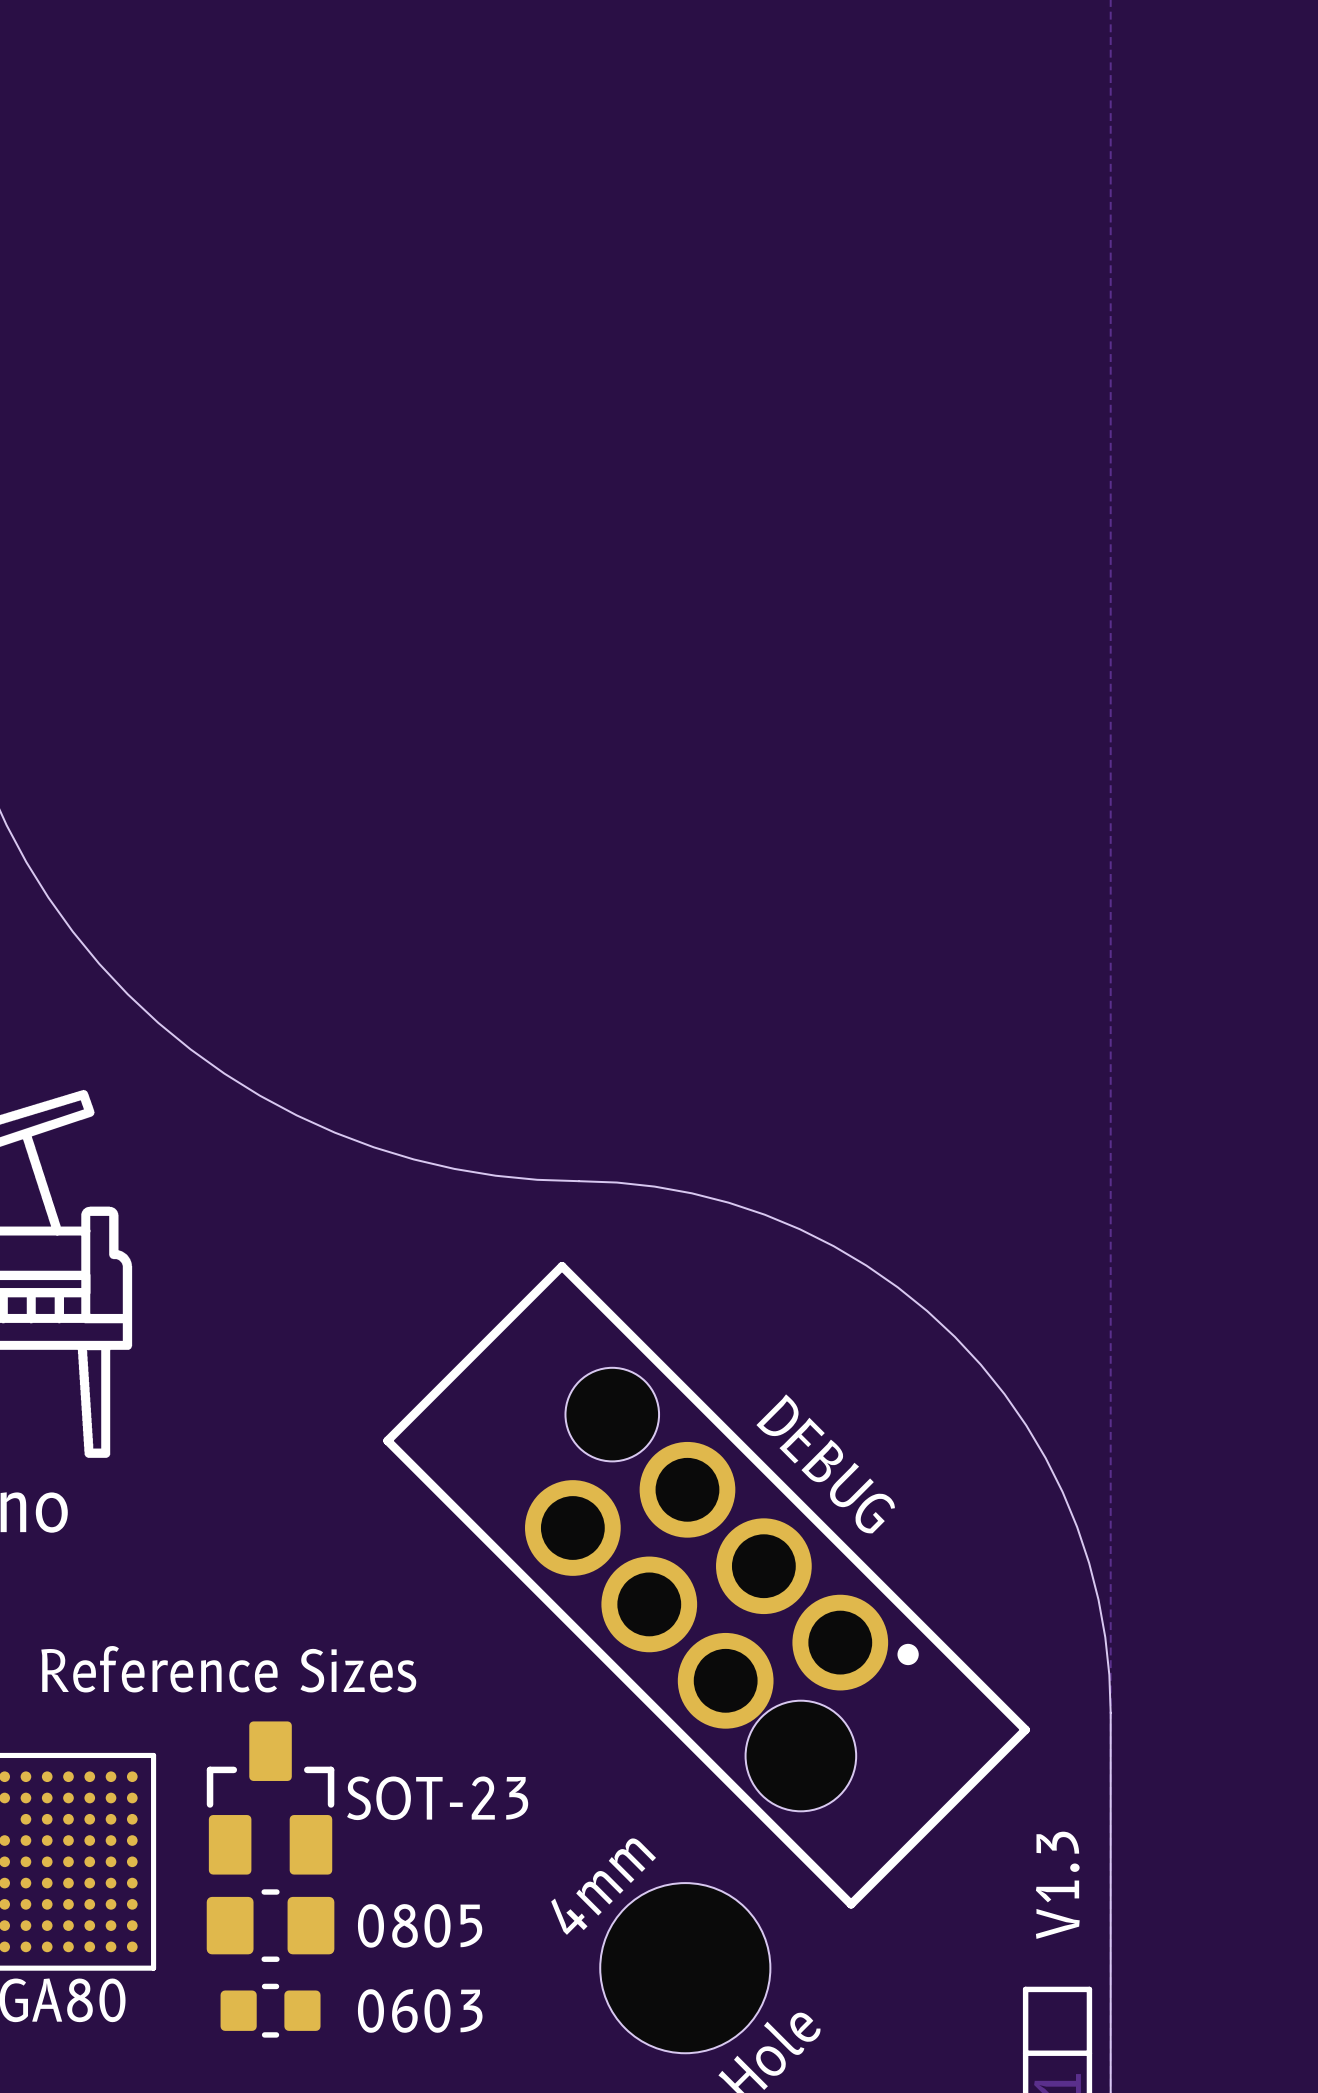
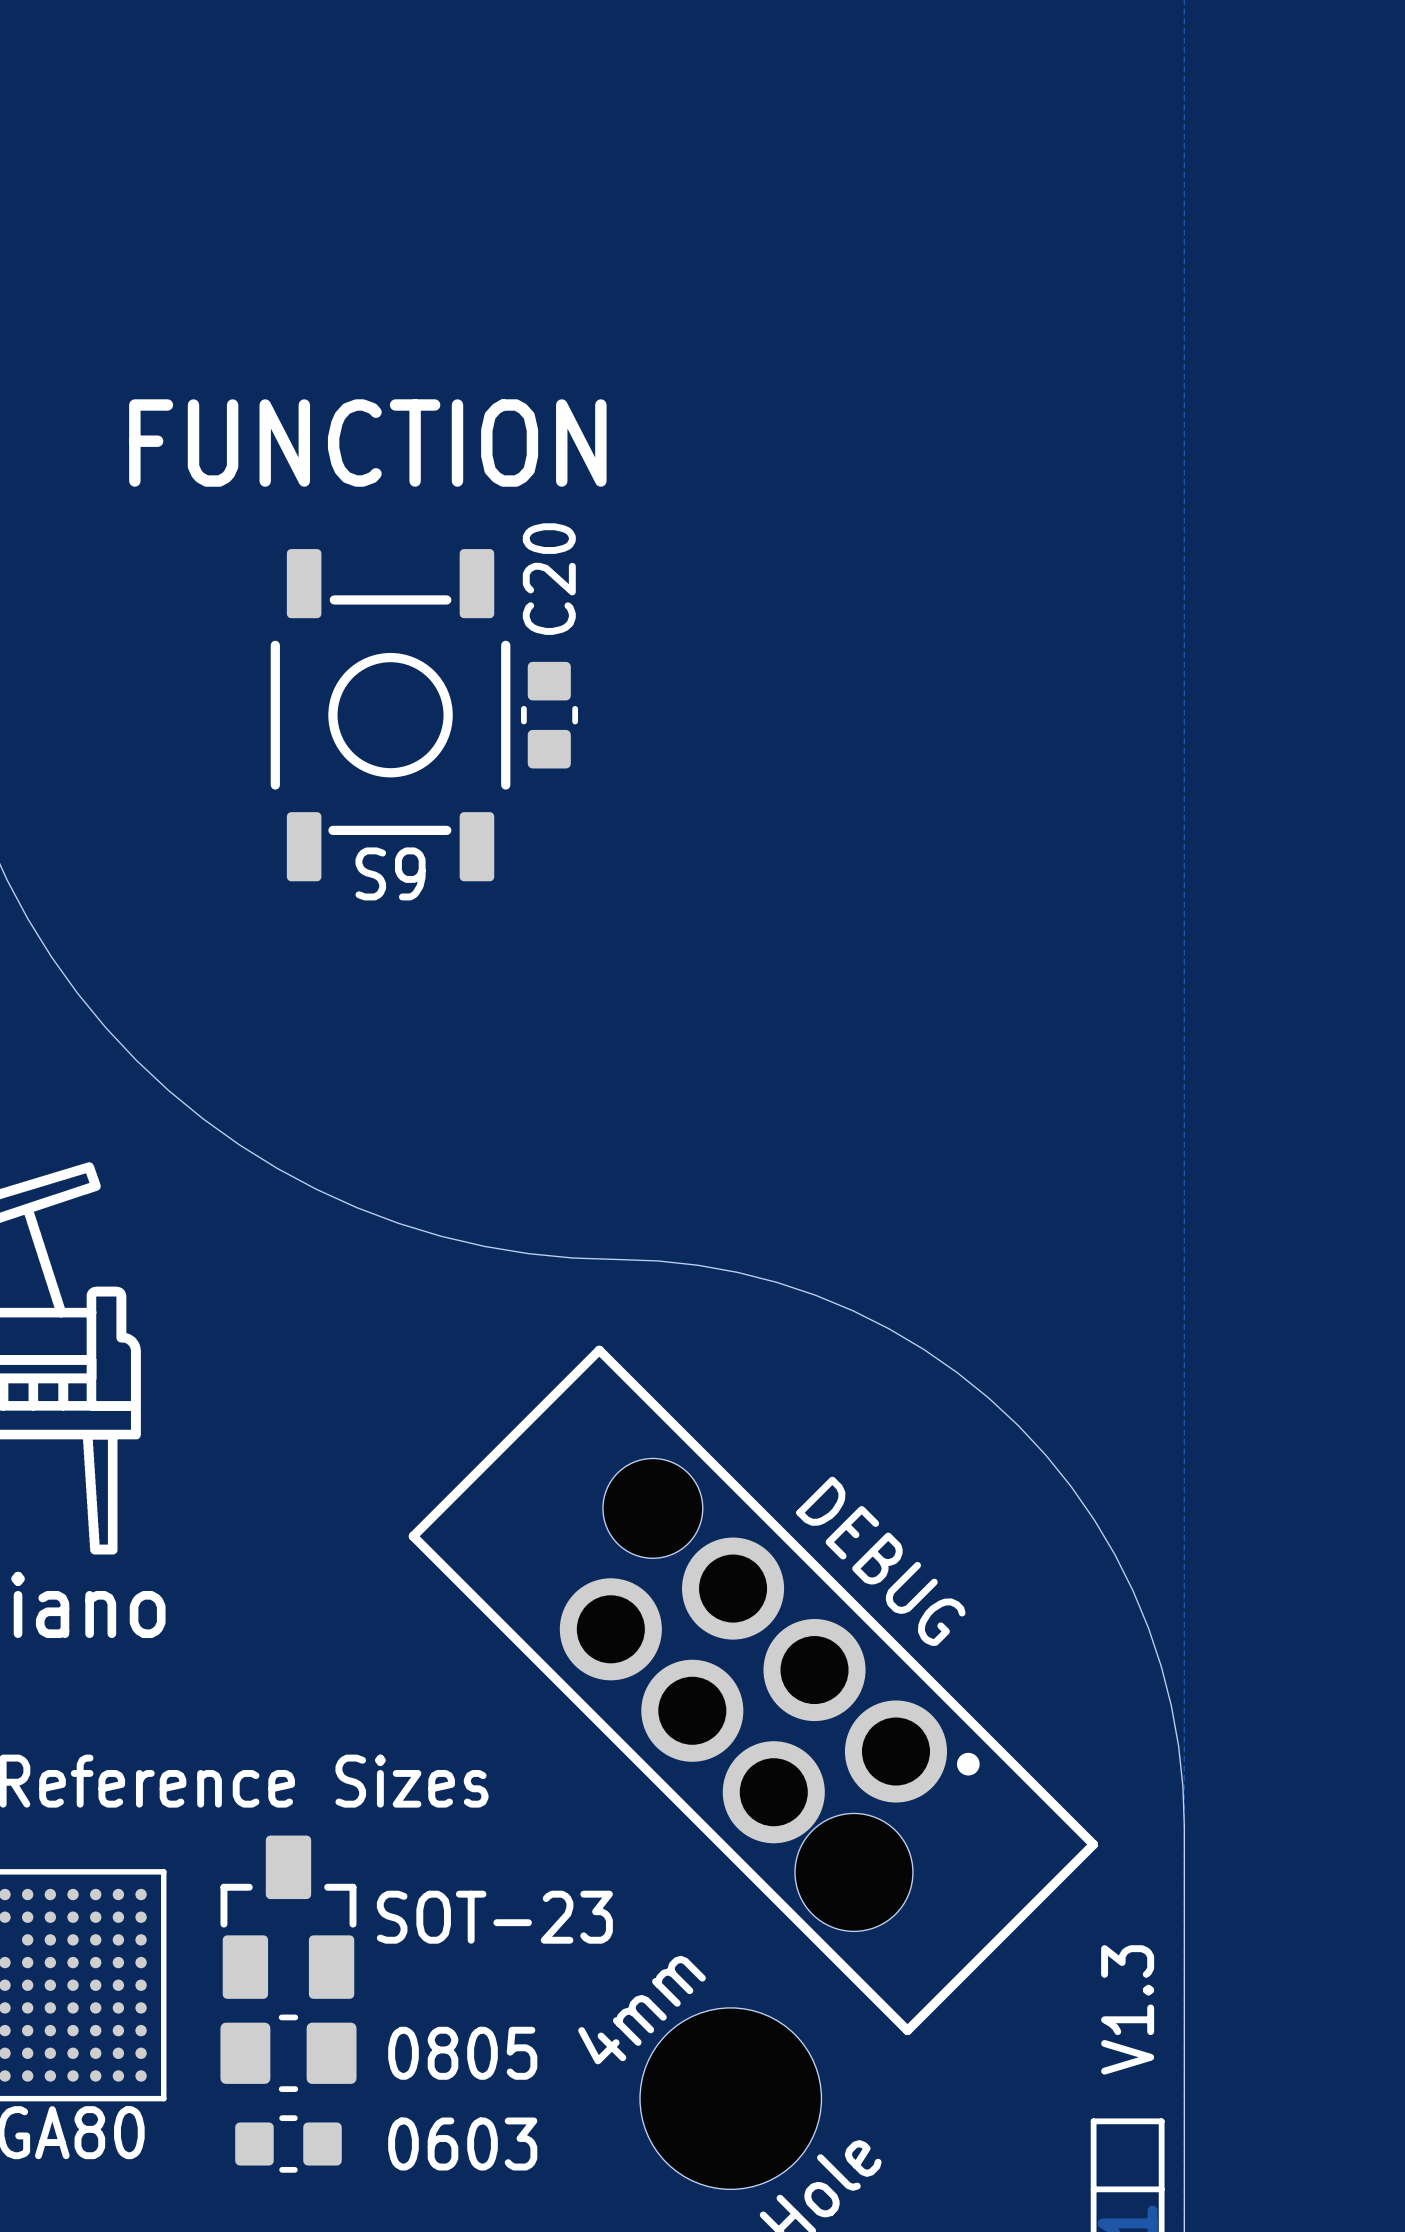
text: none -> FUNCTION (367, 443)
S9: none -> (390, 715)
C20: none -> (549, 715)

